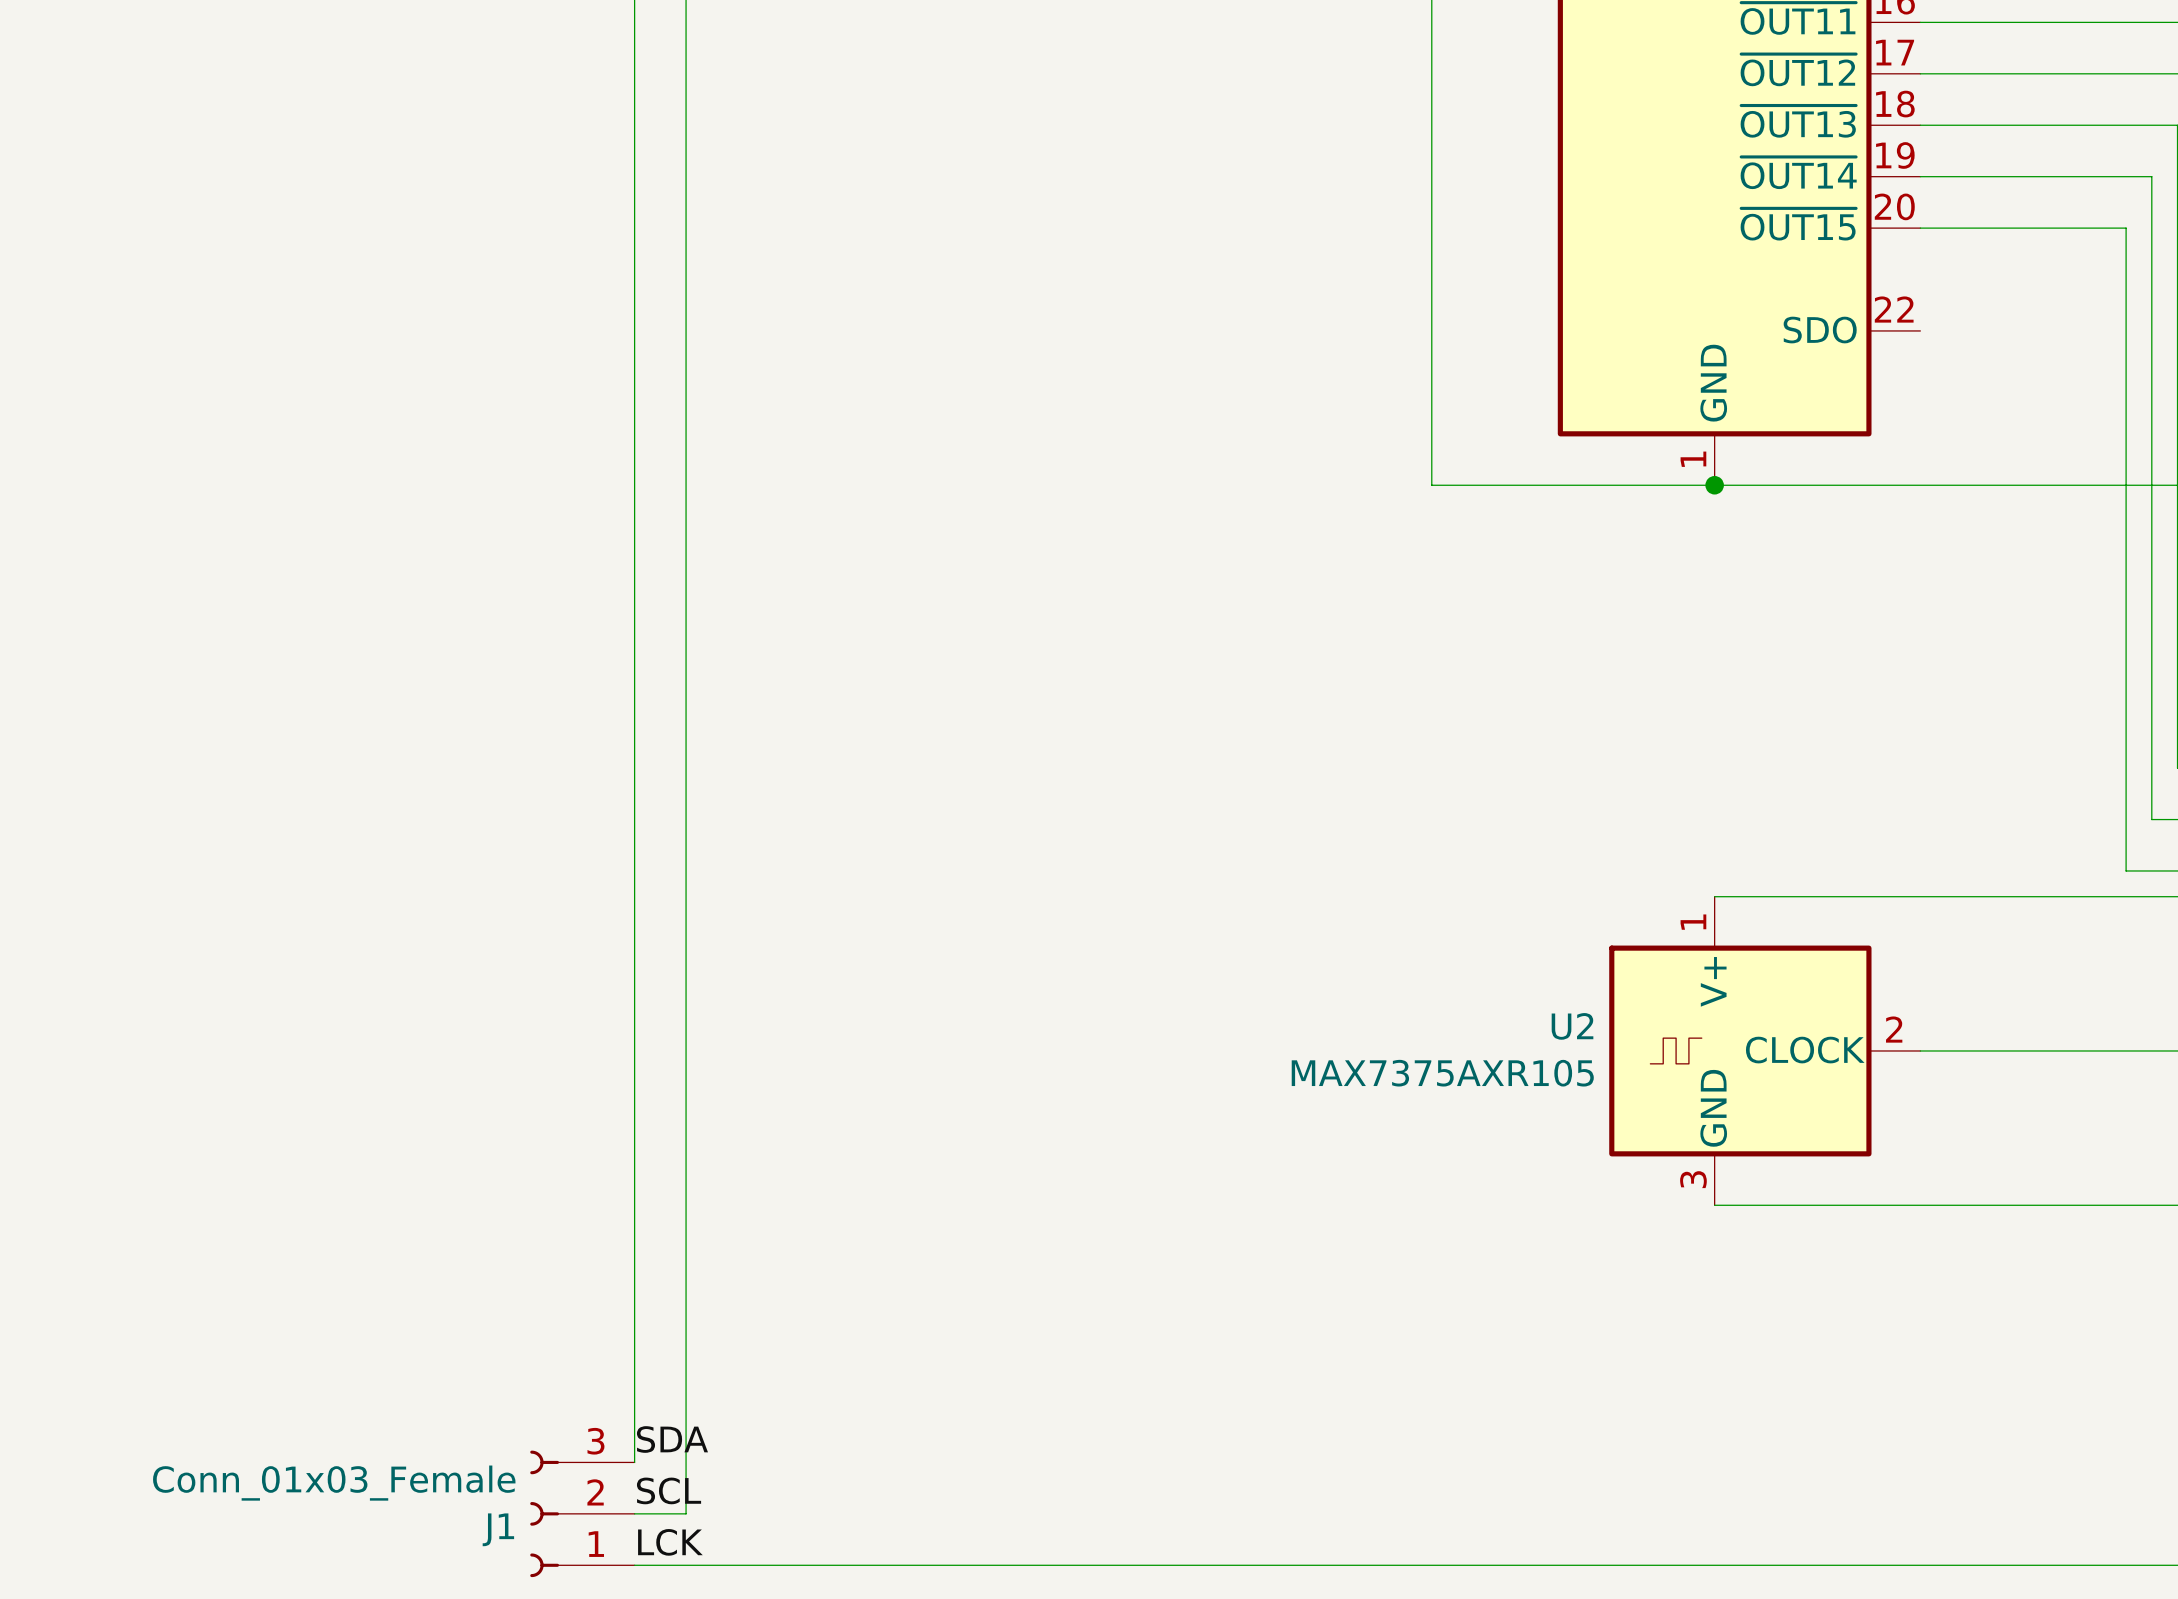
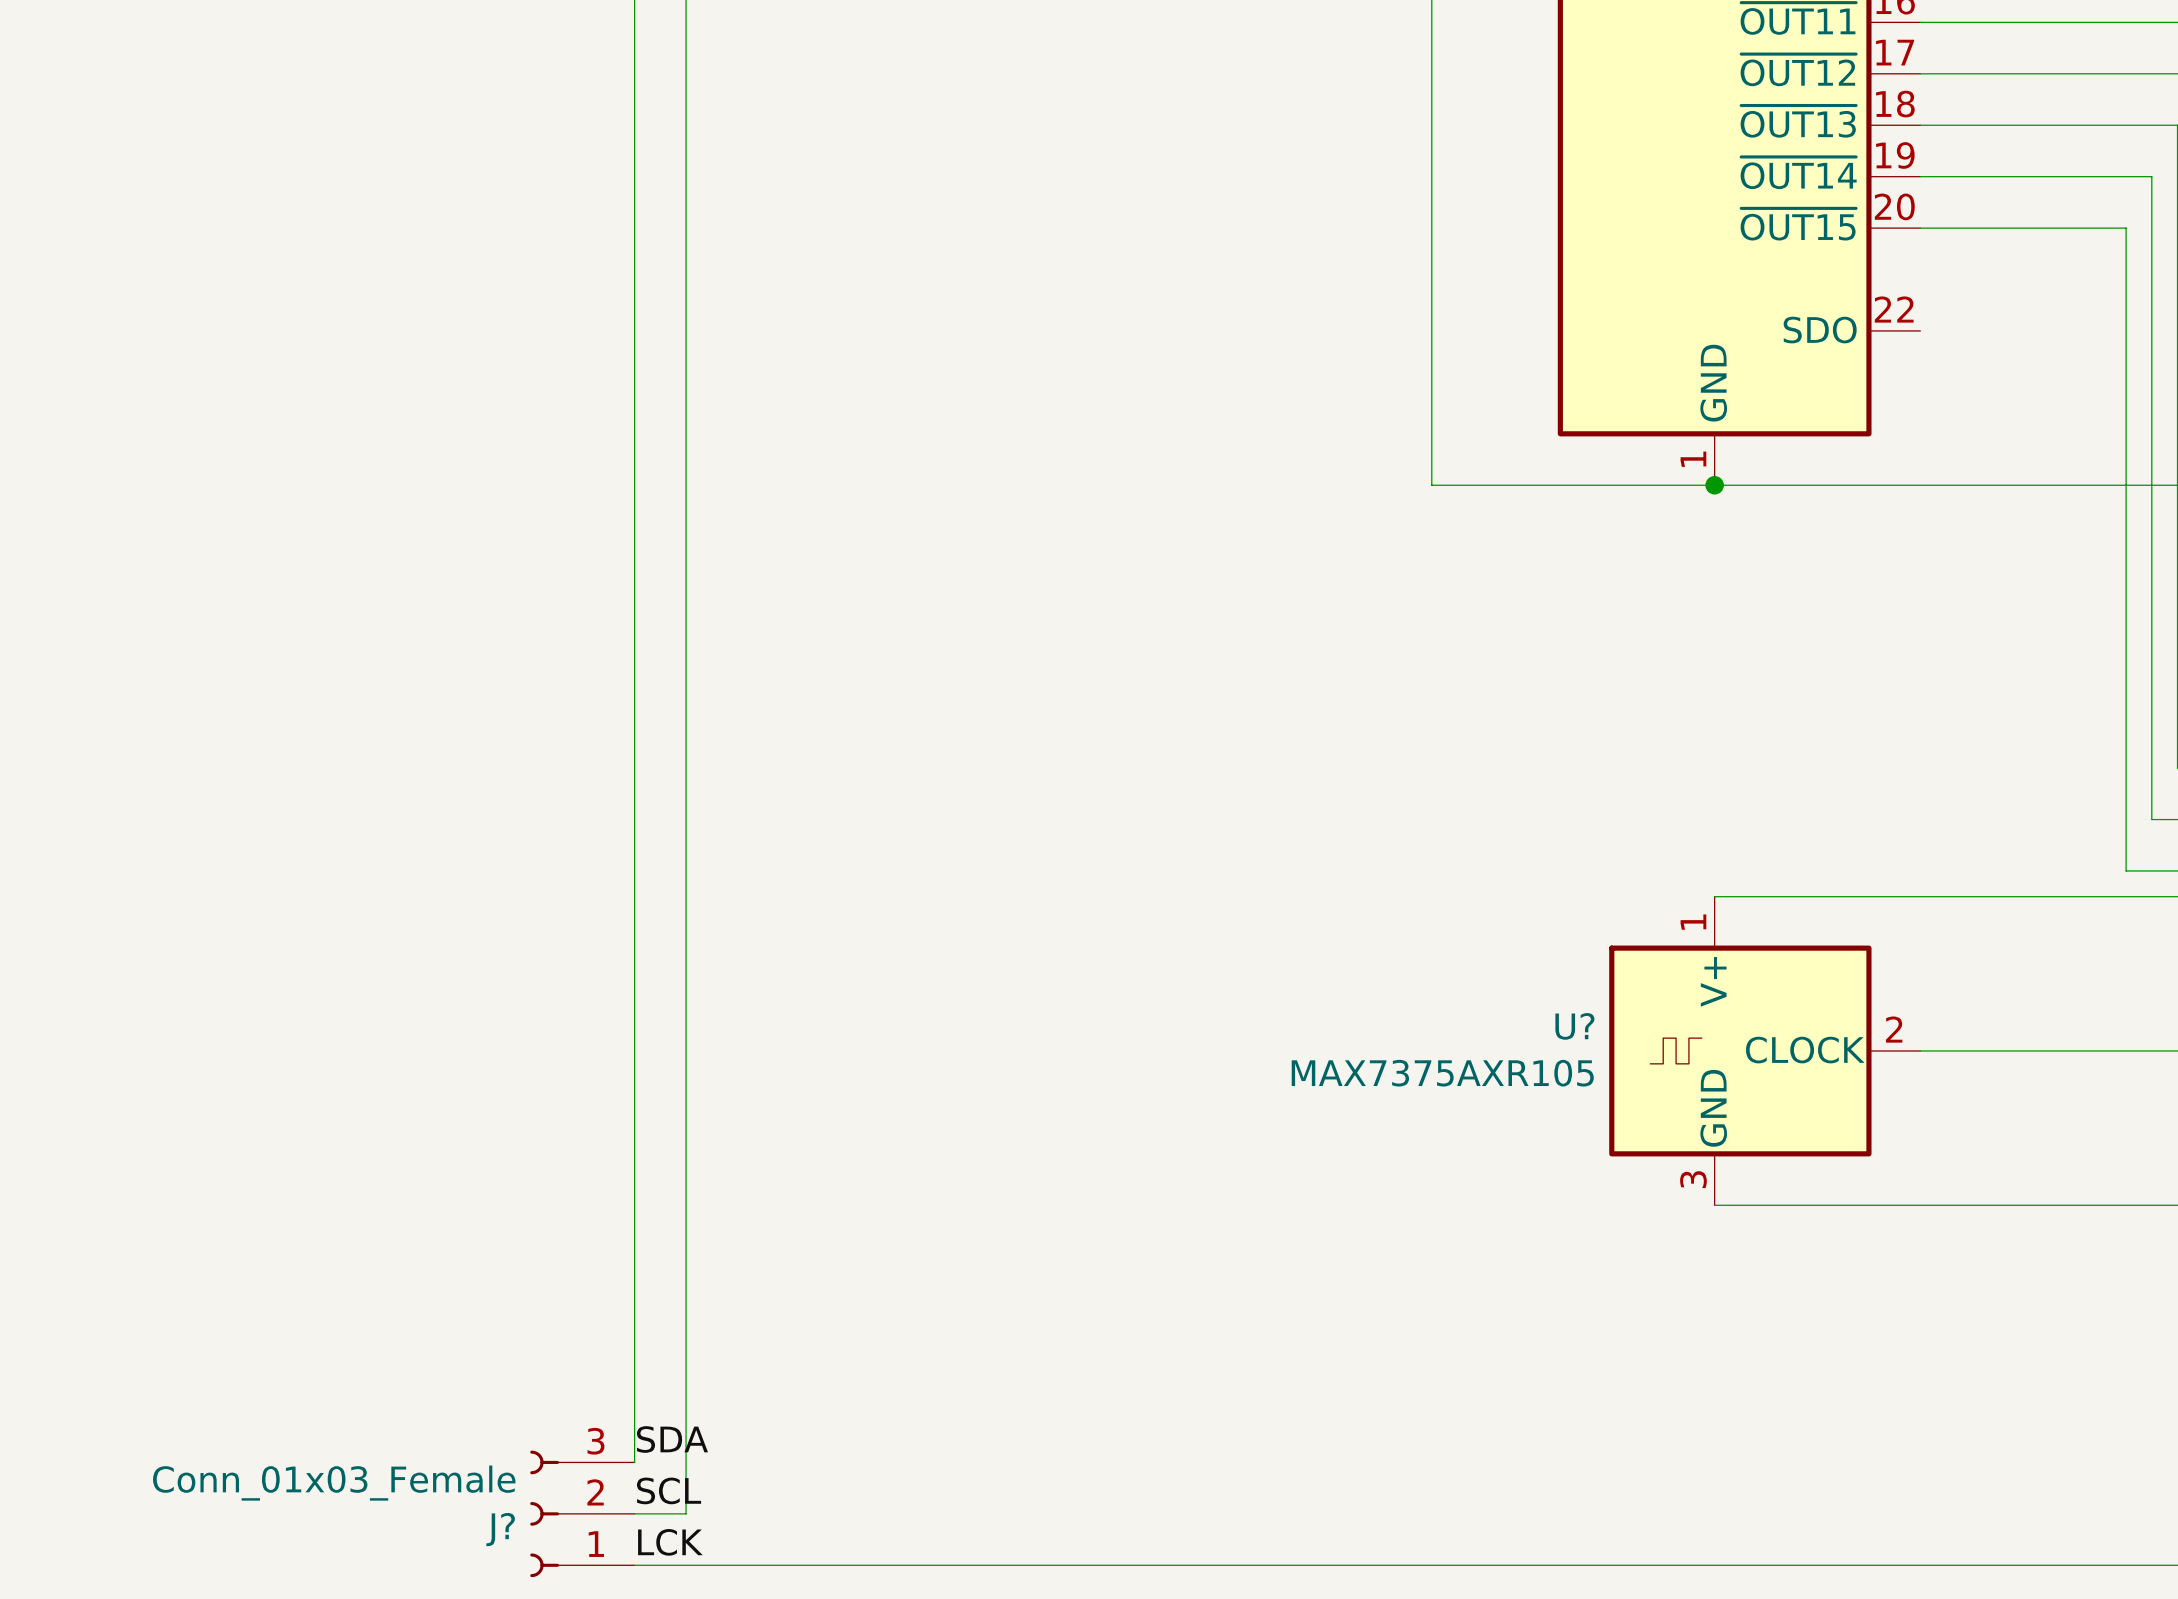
U2 name: U2 (1572, 1026) -> U? (1574, 1026)
J1 name: J1 (498, 1529) -> J? (500, 1529)

